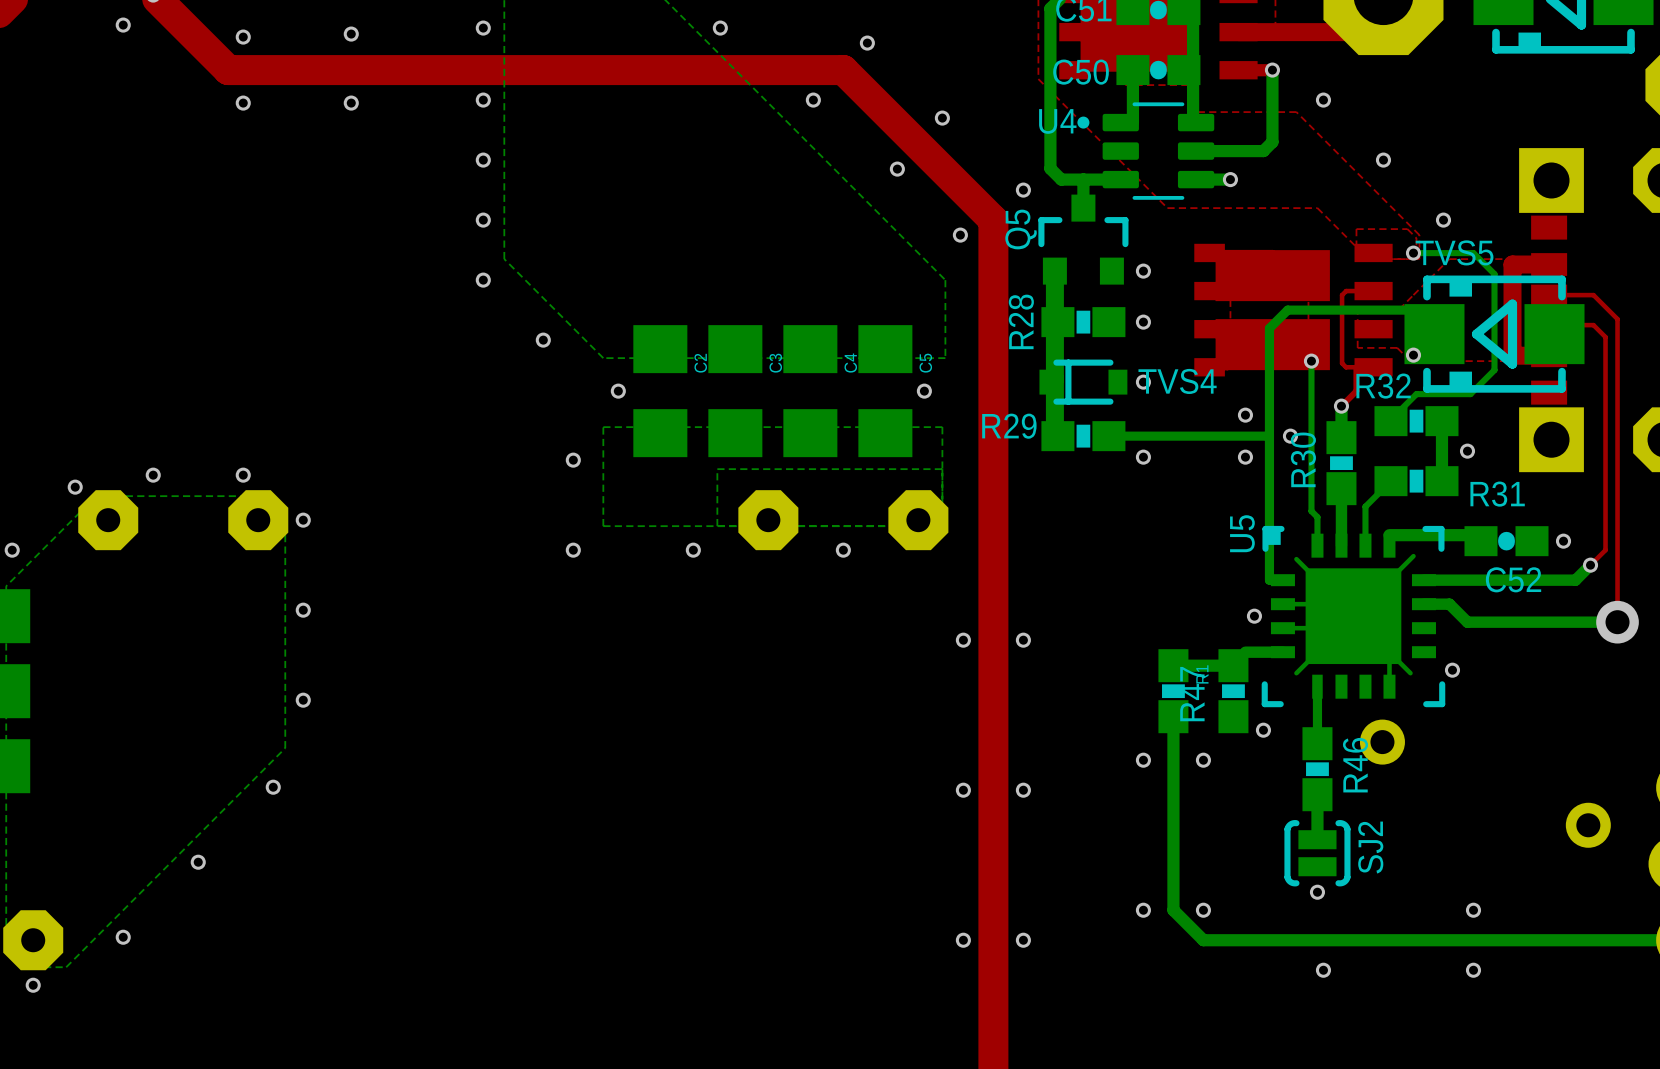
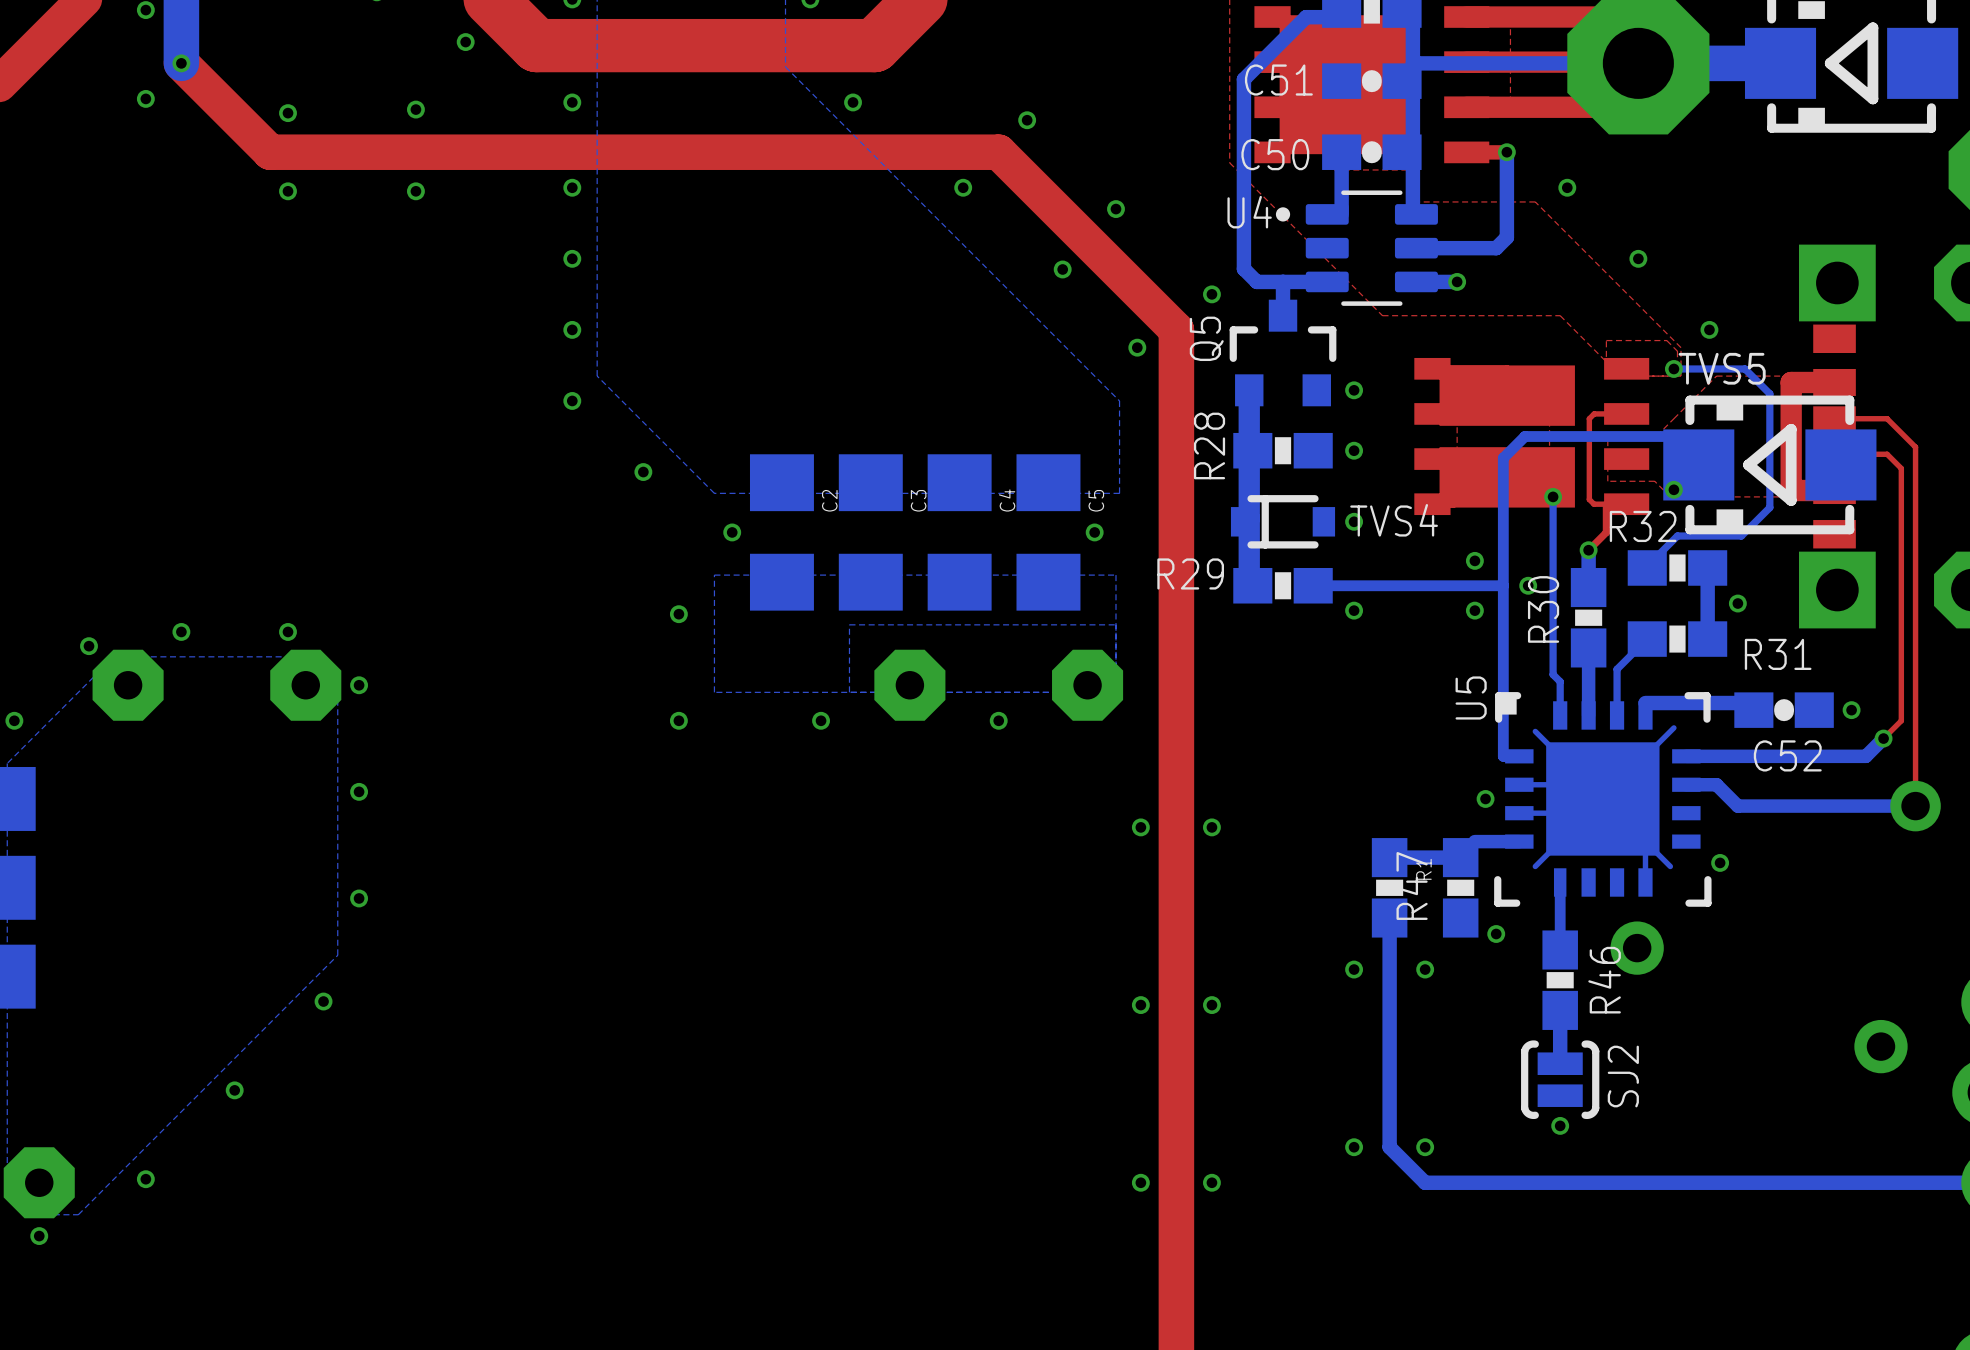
via: (1473, 910) -> none
via: (1323, 970) -> none
via: (1473, 970) -> none

